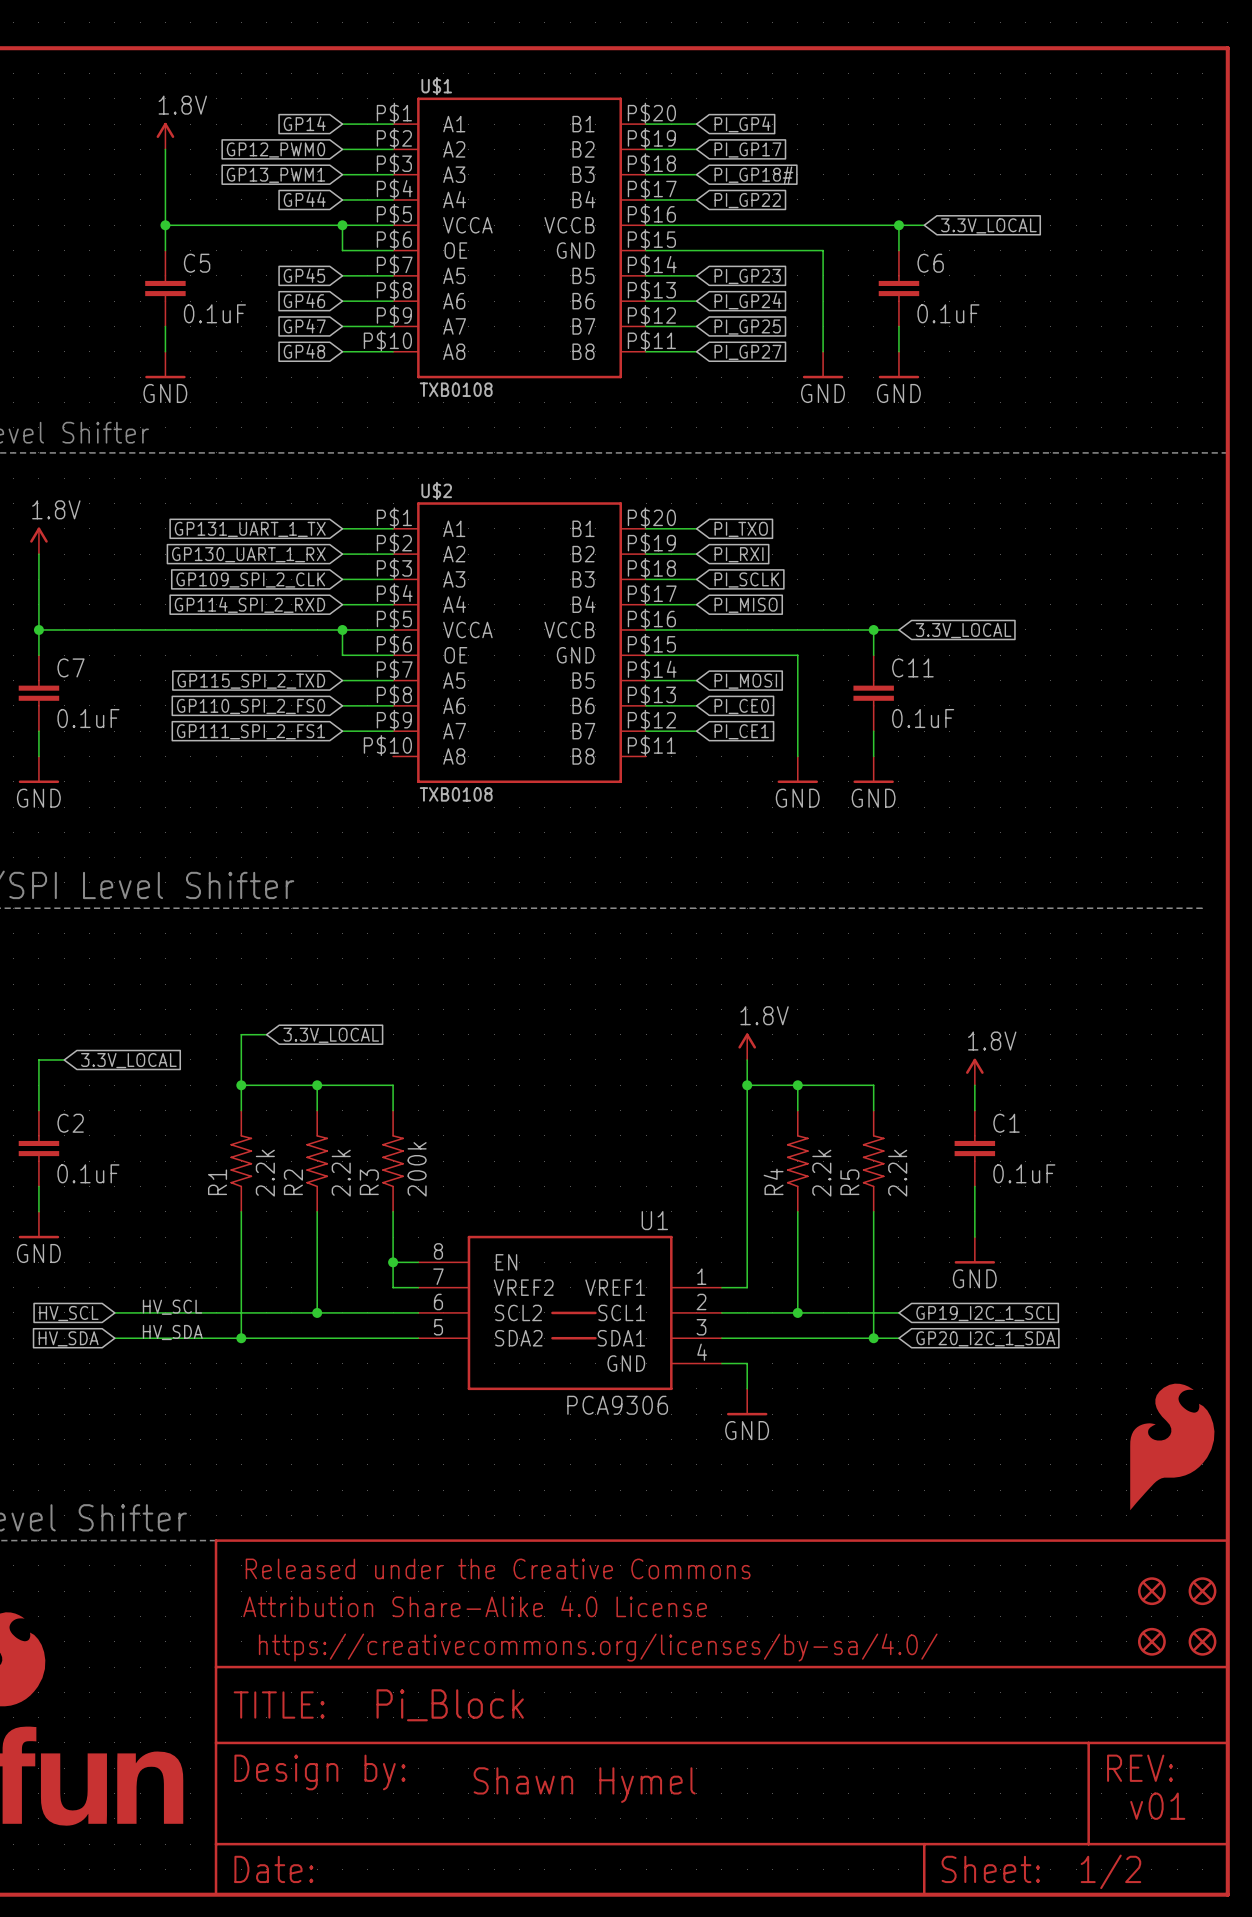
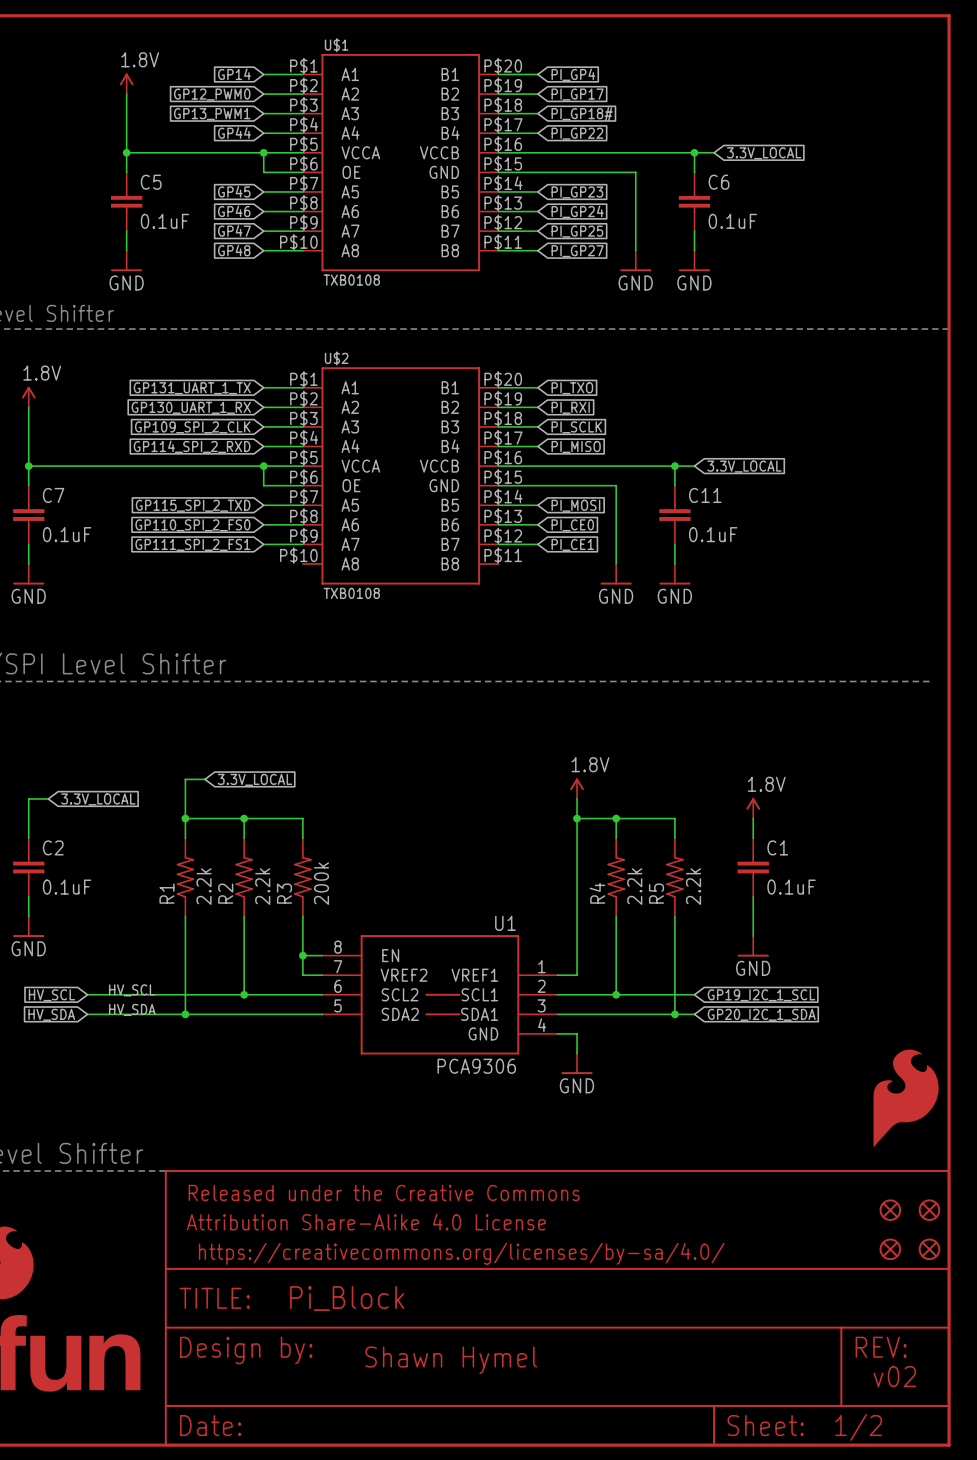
text: v01 (1157, 1806) -> v02 (894, 1376)

